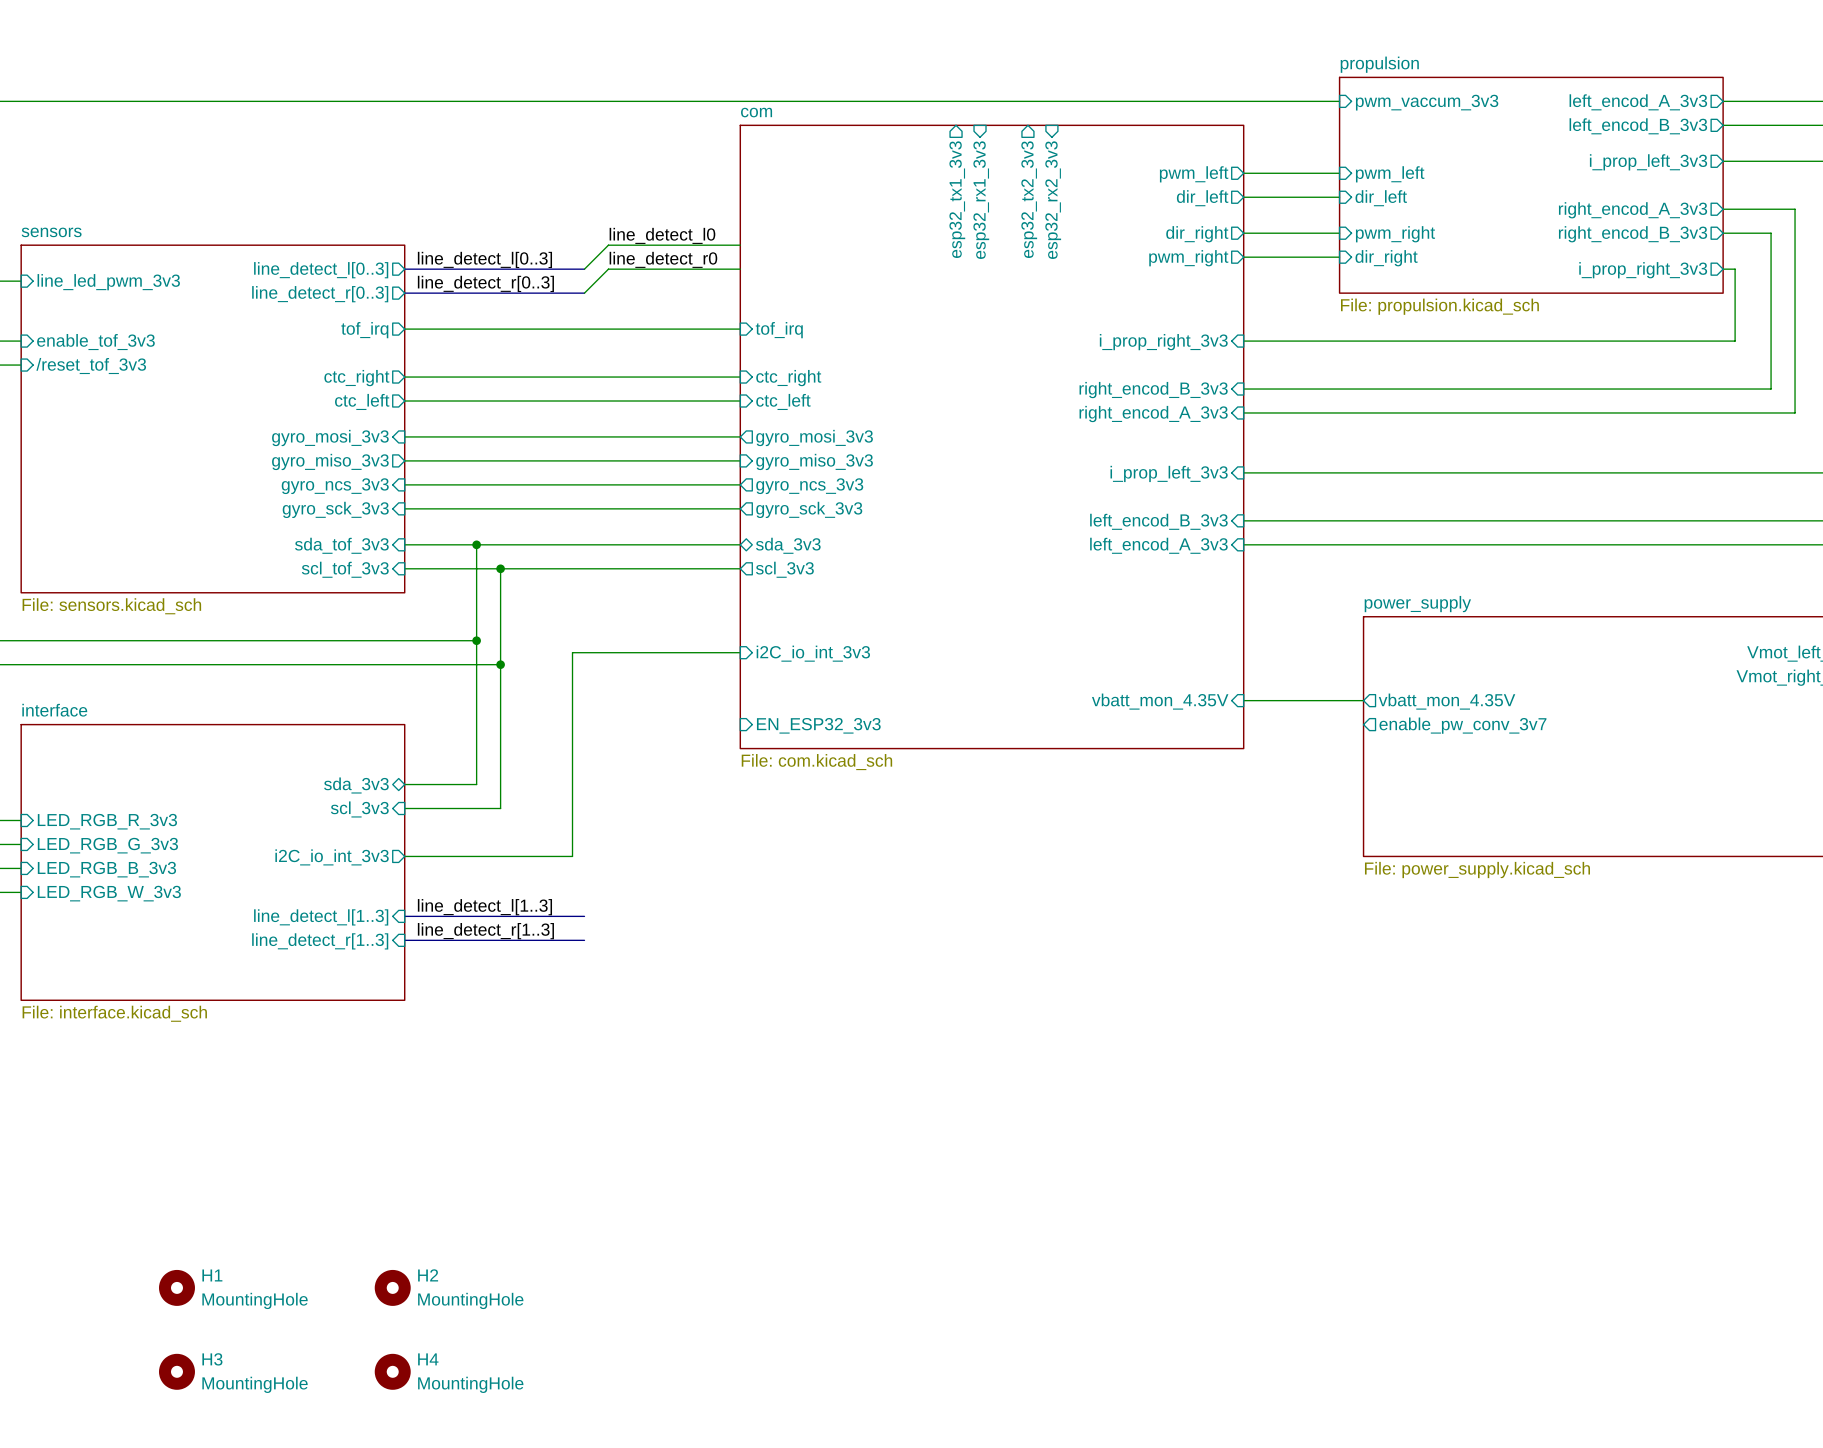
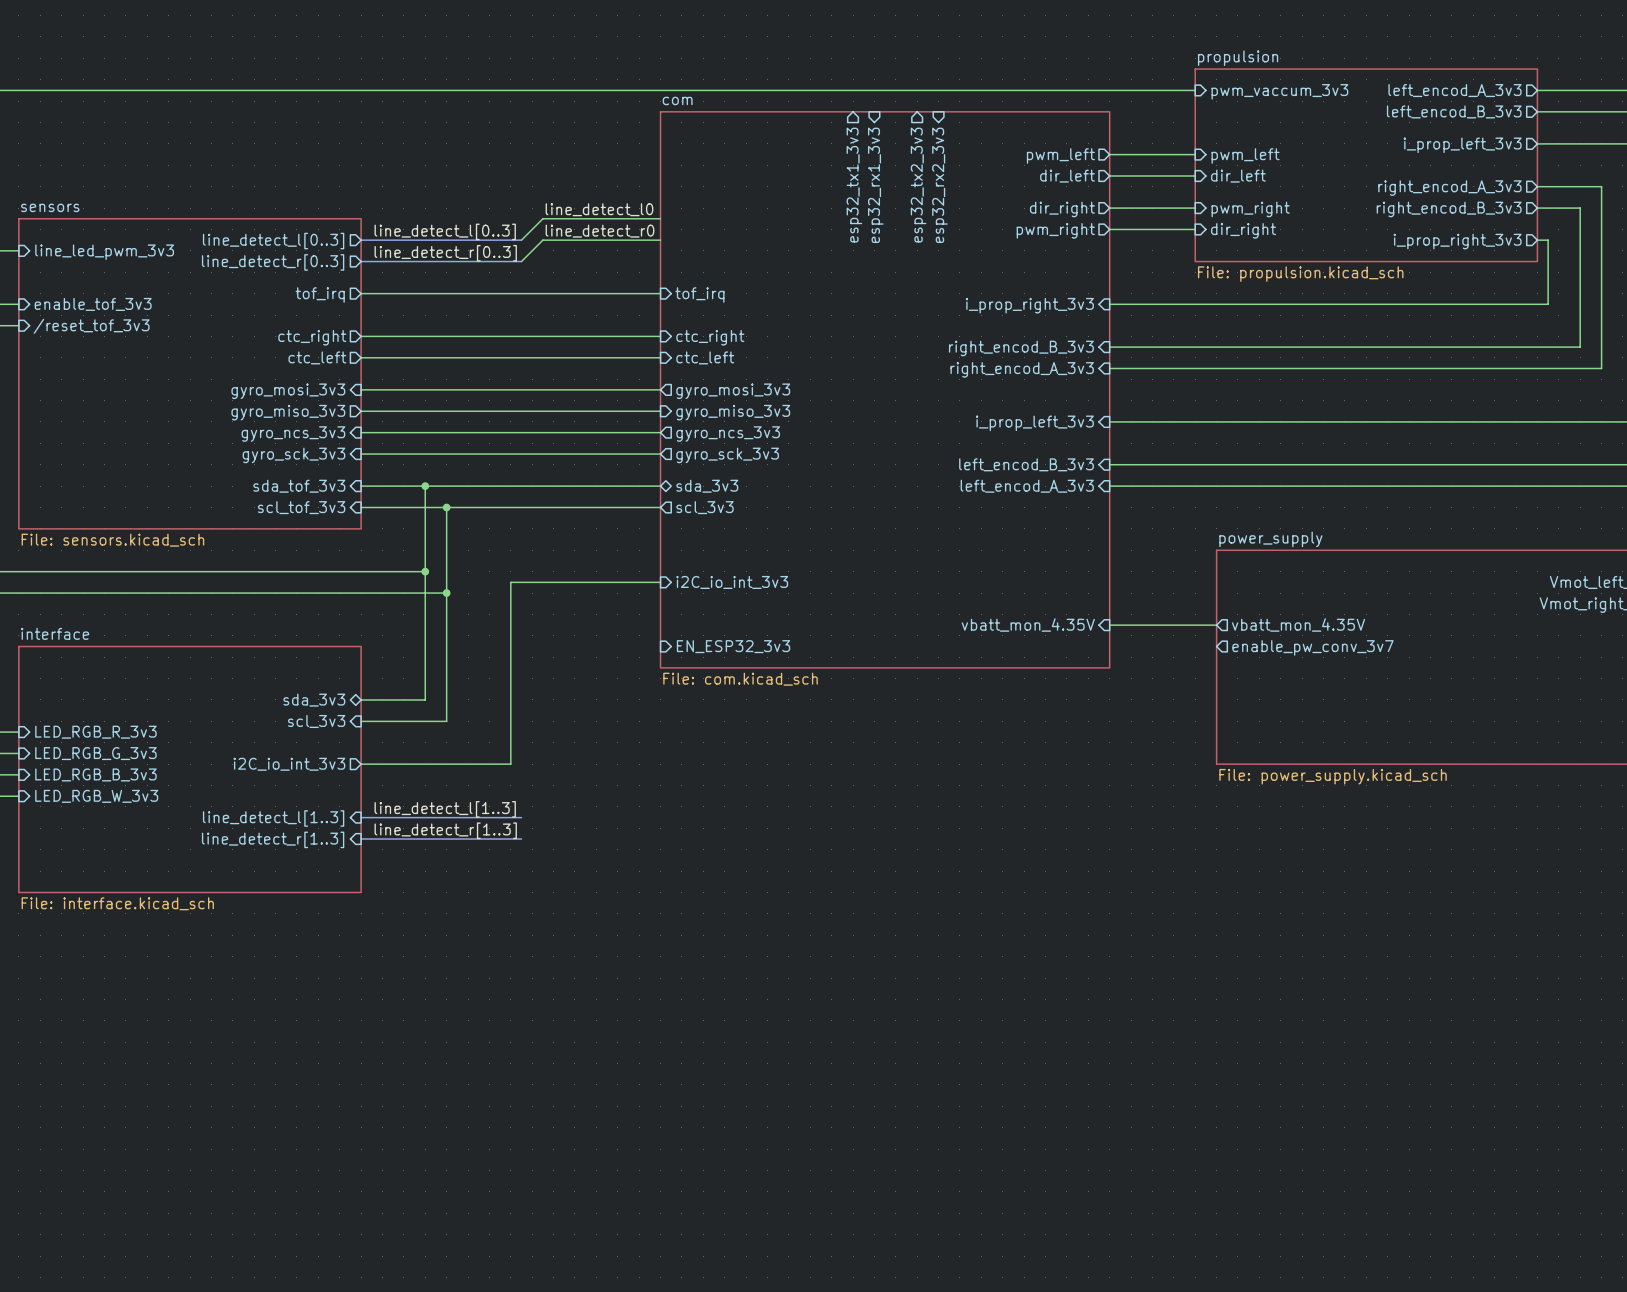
H1: MountingHole (176, 1287) -> none
H2: MountingHole (392, 1287) -> none
H3: MountingHole (176, 1371) -> none
H4: MountingHole (392, 1371) -> none

